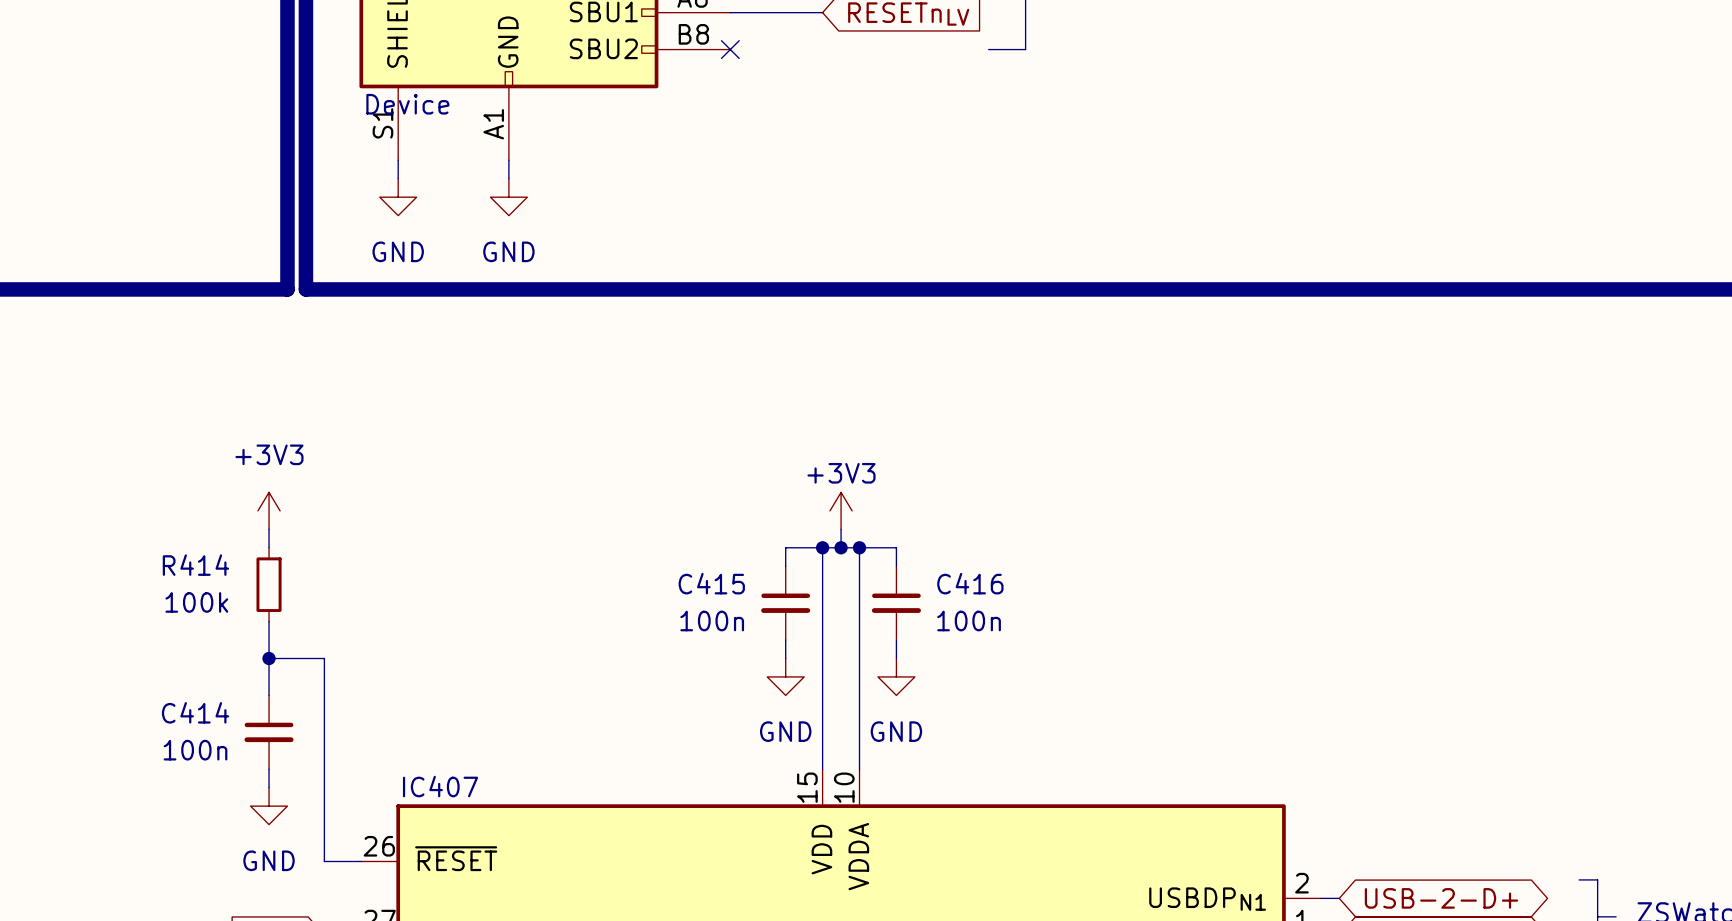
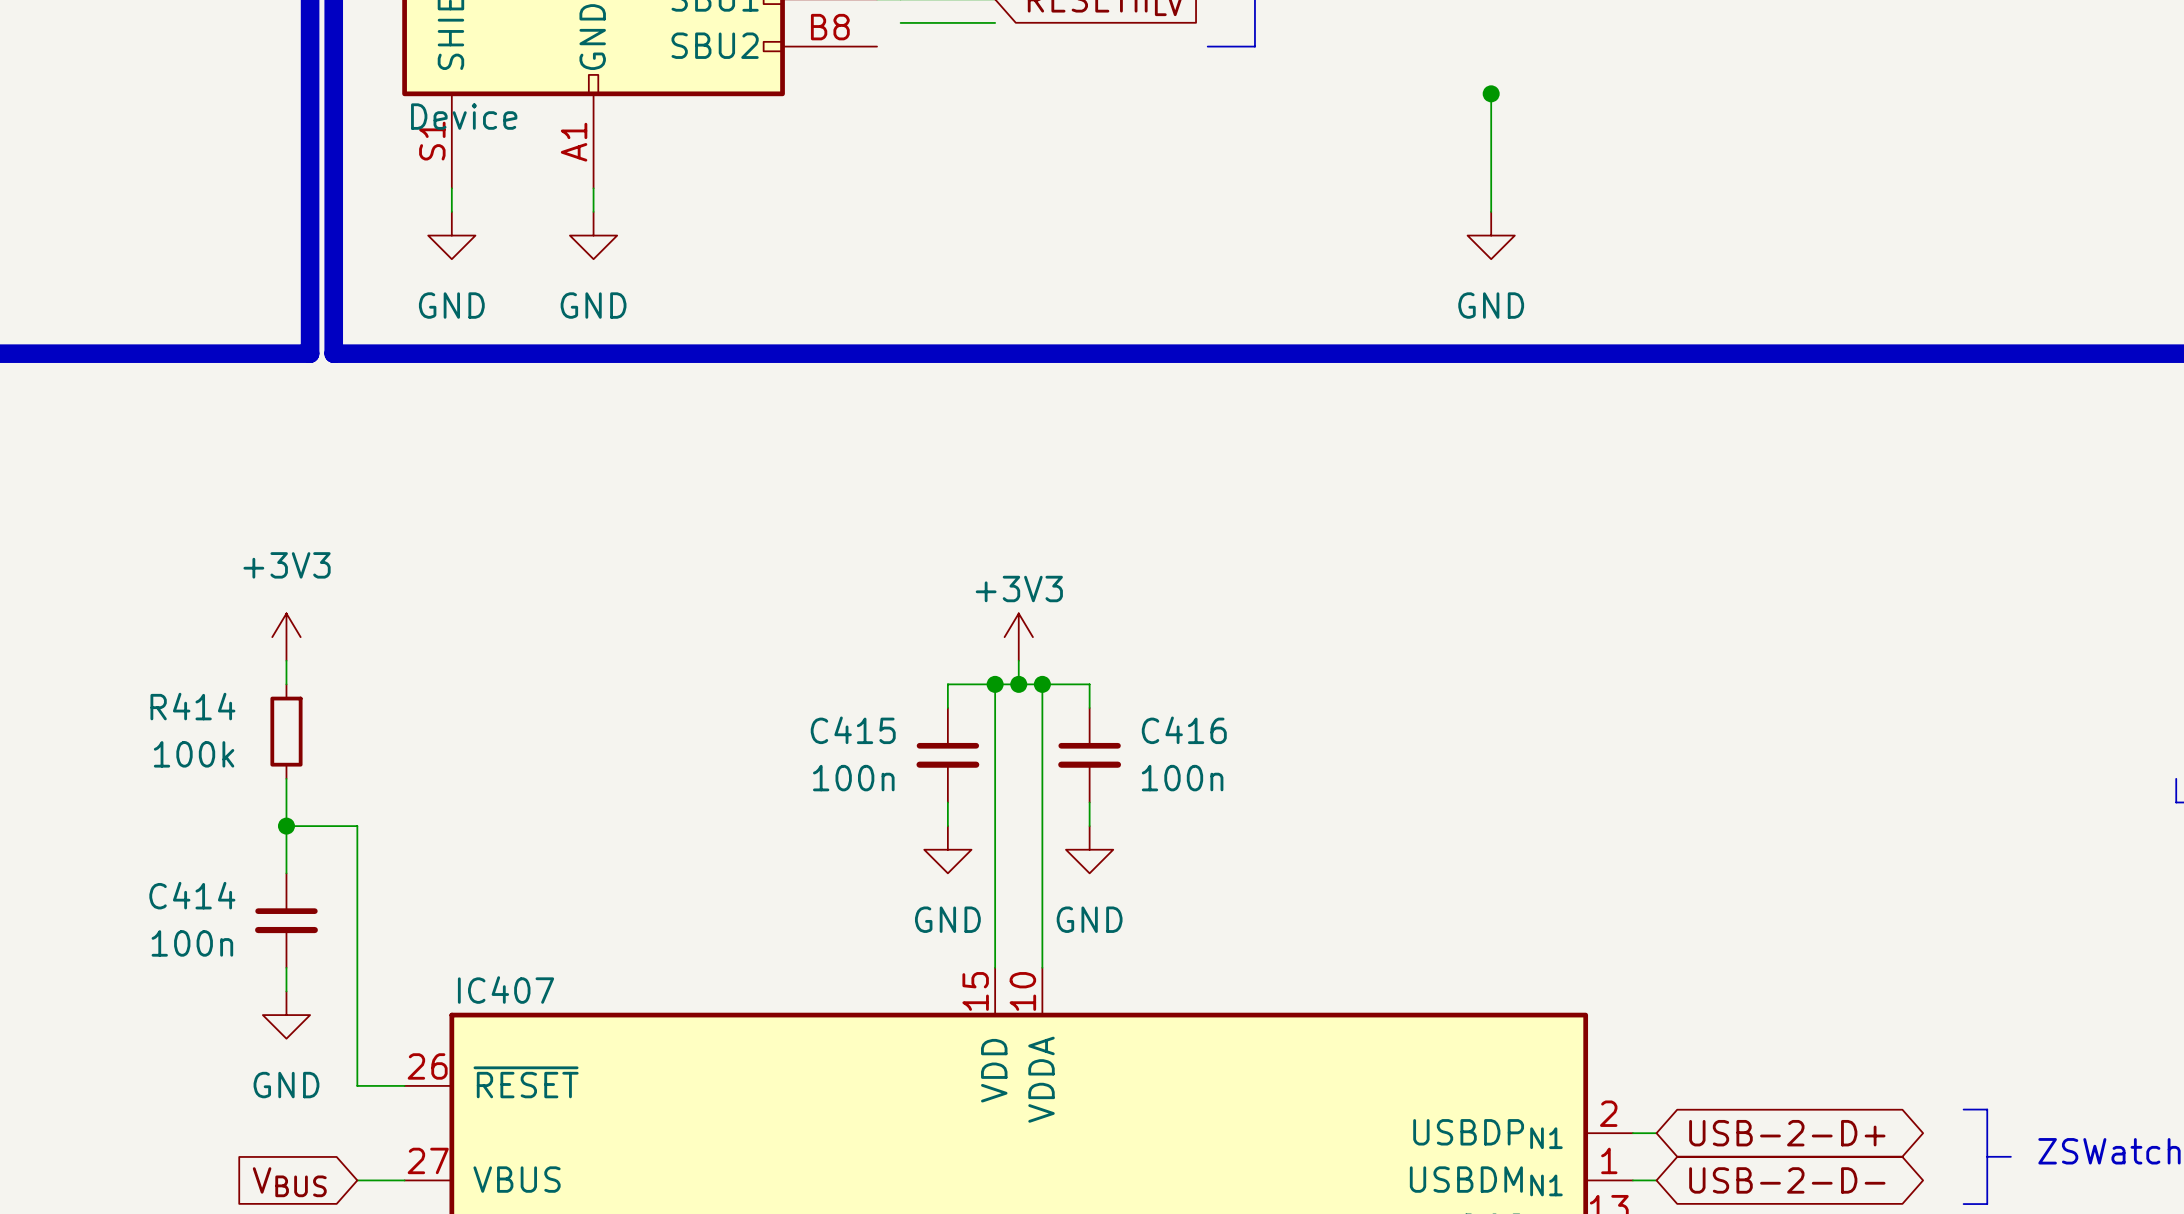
wire: none -> (900, 22) (995, 22)
no-connect mark: (730, 49) -> none
wire: none -> (1491, 93) (1491, 211)
junction: none -> (1491, 93)
power symbol: none -> GND (1491, 235)

